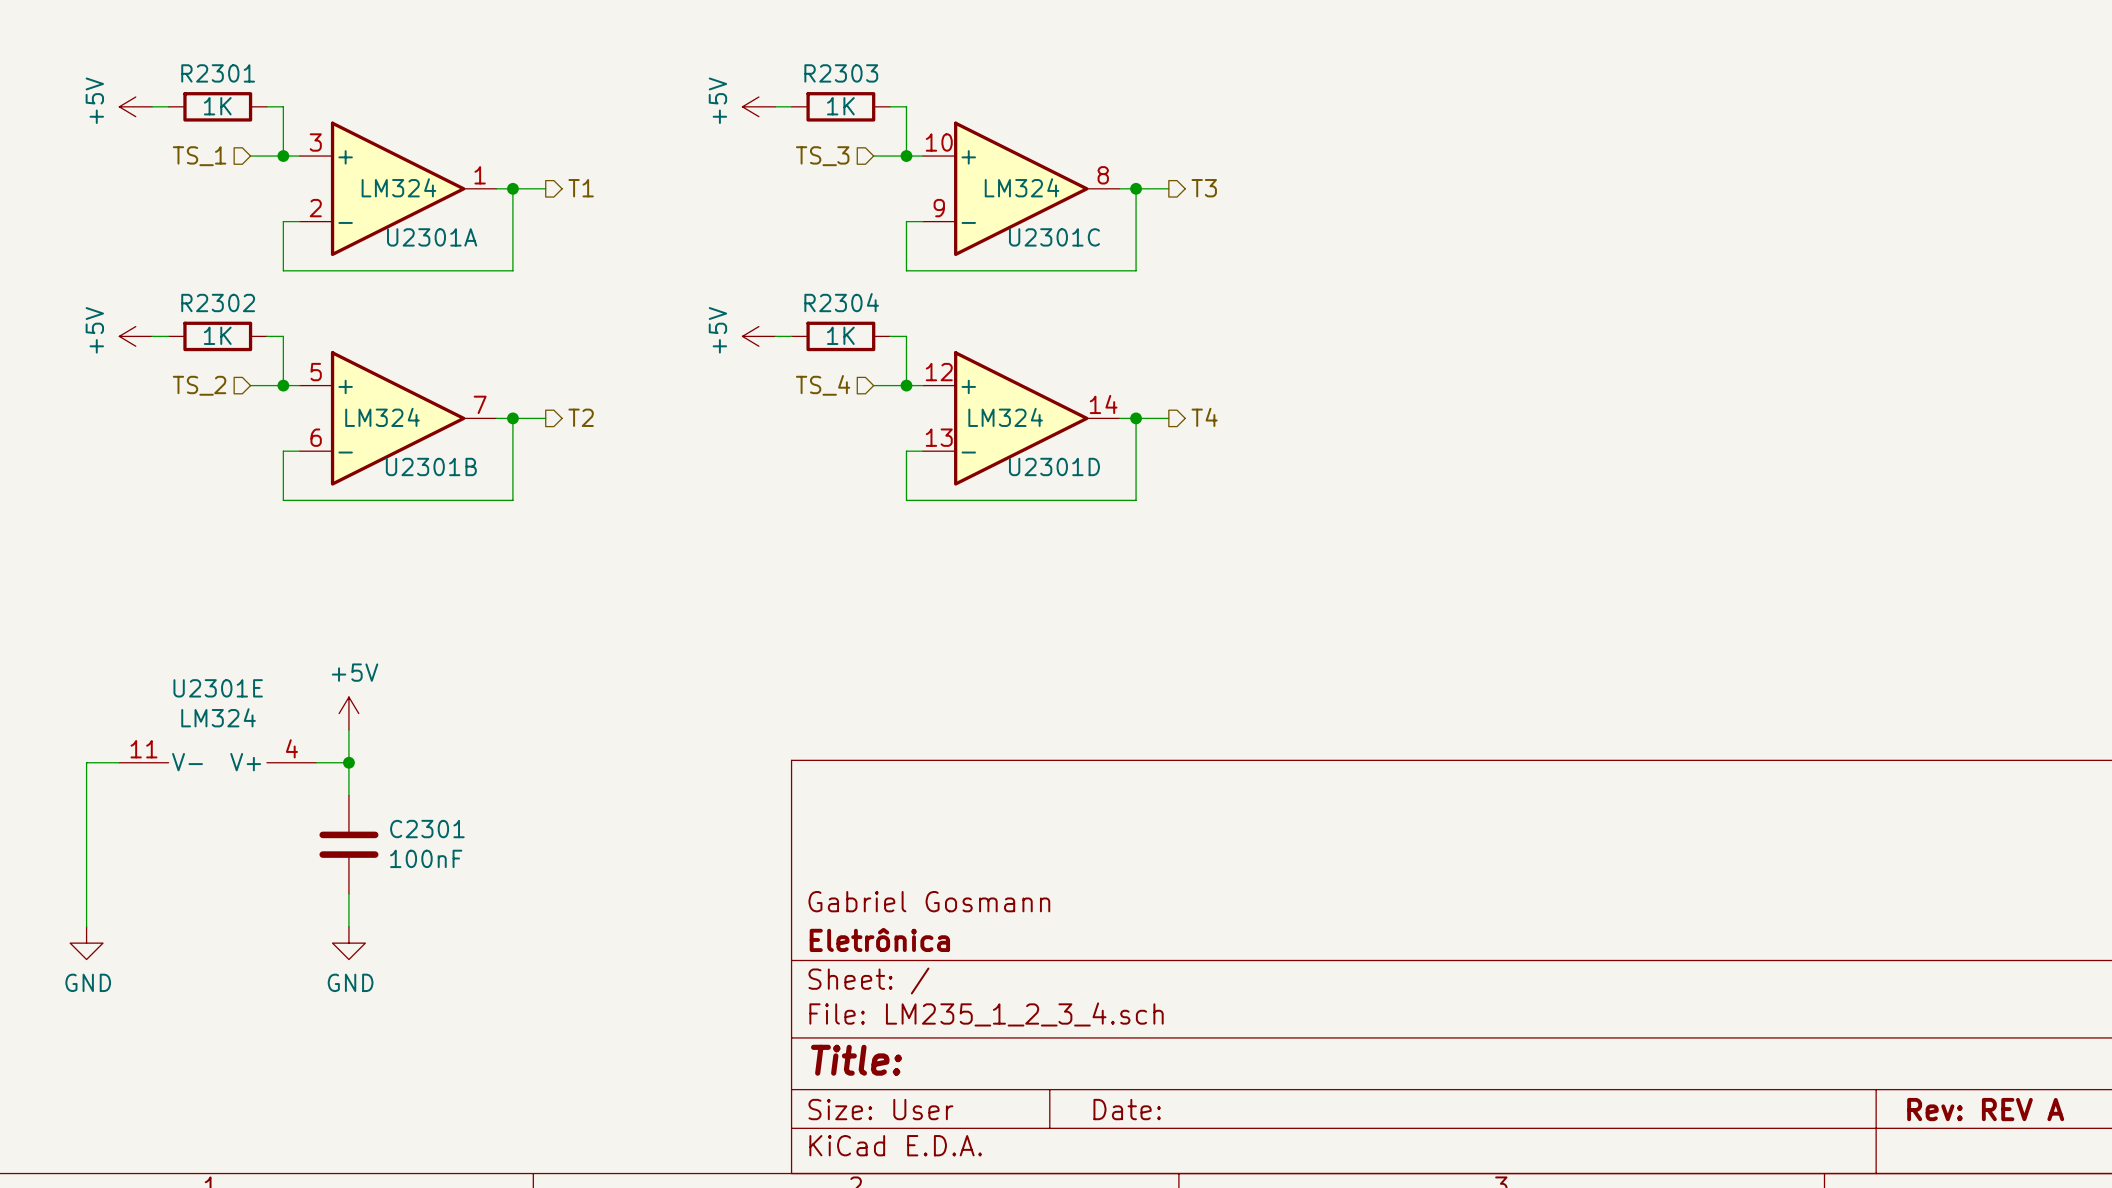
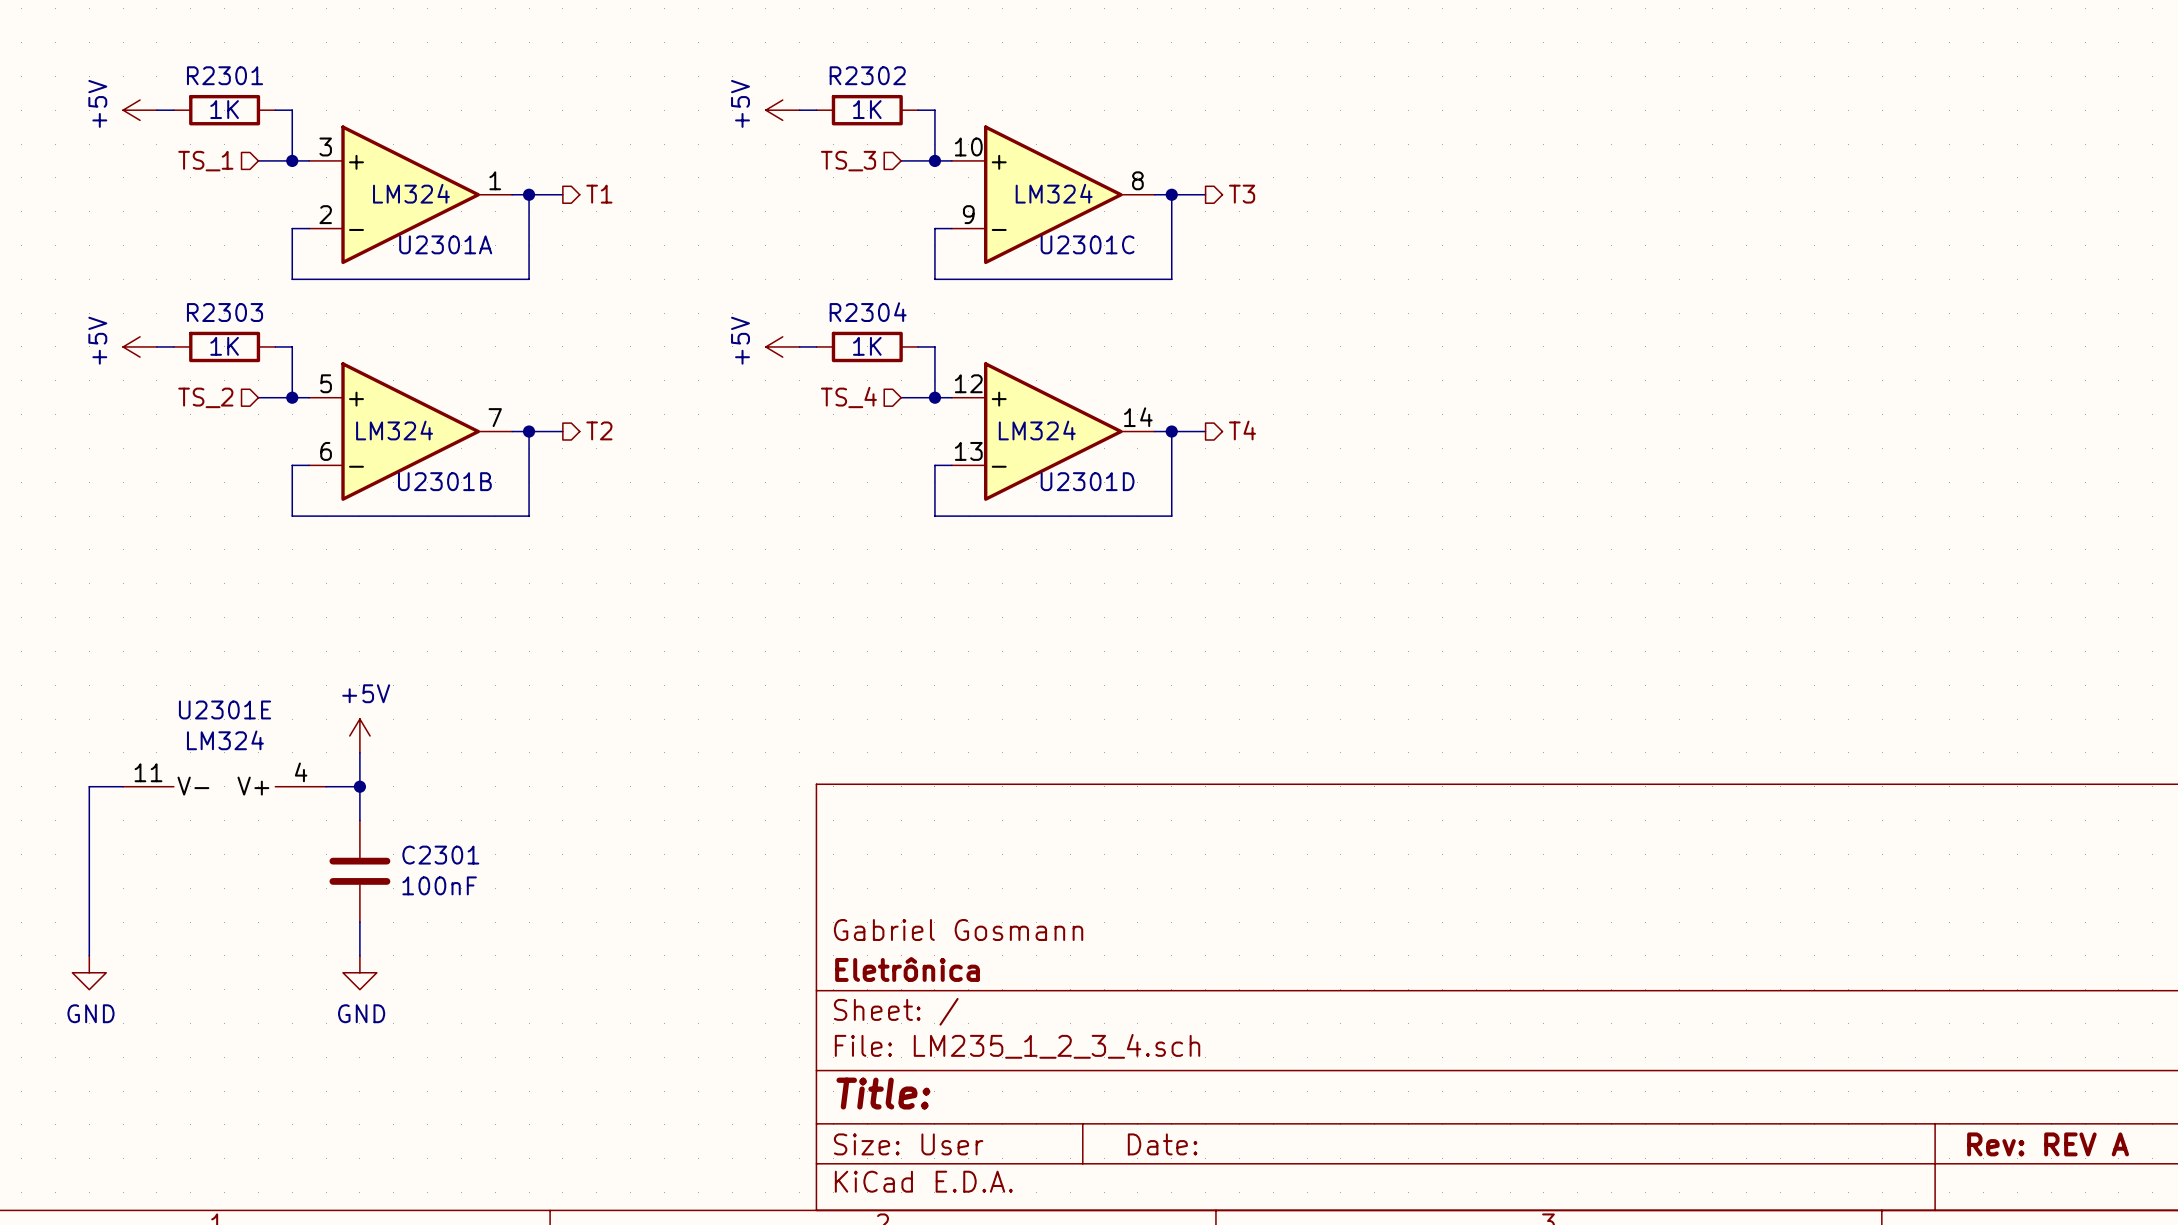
R2303 name: R2303 (841, 73) -> R2302 (867, 75)
R2302 name: R2302 (218, 302) -> R2303 (225, 312)

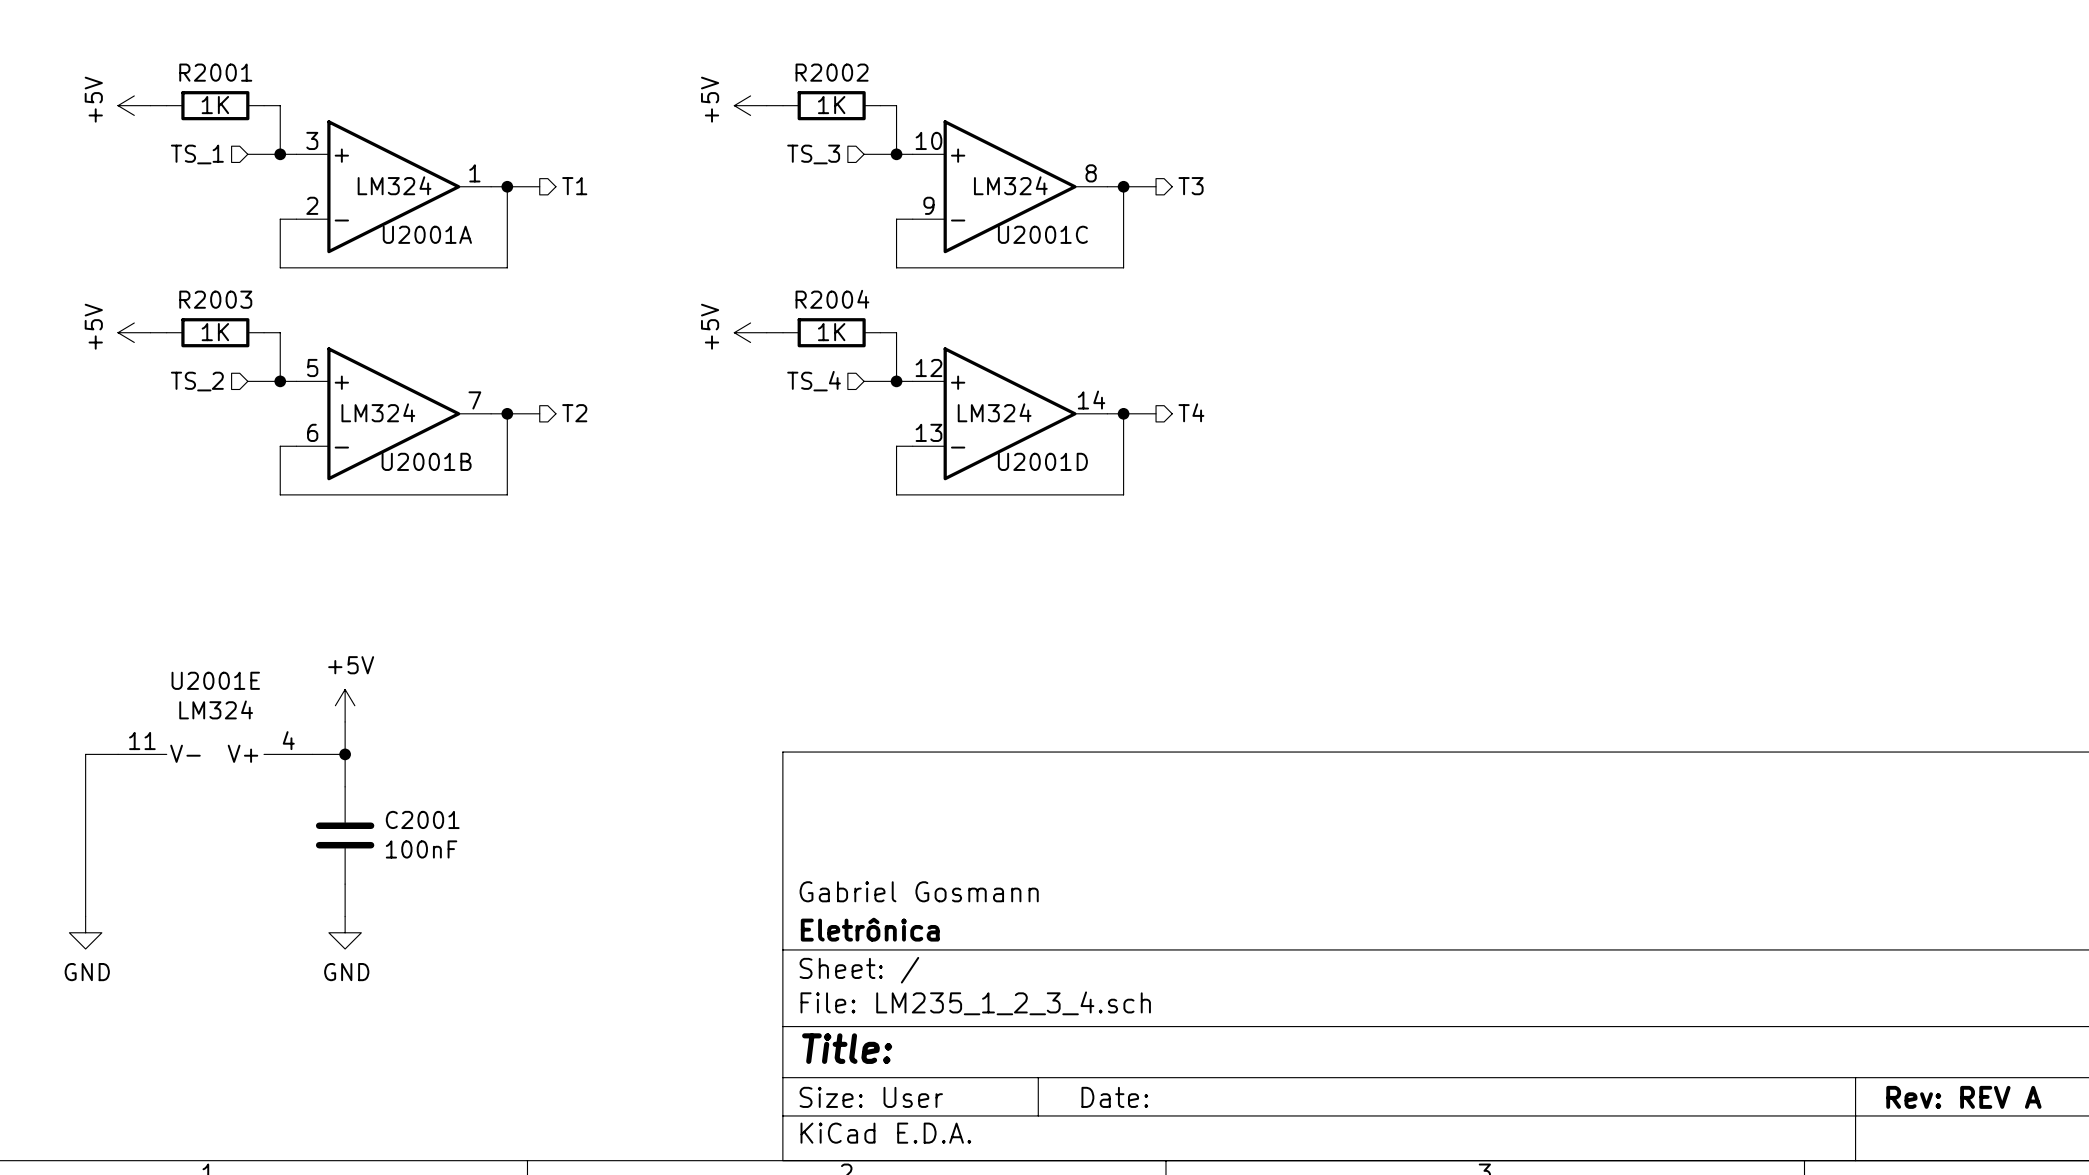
R2301 name: R2301 (225, 75) -> R2001 (215, 72)
R2302 name: R2302 (867, 75) -> R2002 (832, 72)
U2301A name: U2301A (445, 244) -> U2001A (427, 234)
U2301C name: U2301C (1087, 244) -> U2001C (1042, 234)
R2303 name: R2303 (225, 312) -> R2003 (215, 299)
R2304 name: R2304 (868, 312) -> R2004 (832, 299)
U2301B name: U2301B (444, 481) -> U2001B (426, 461)
U2301D name: U2301D (1087, 481) -> U2001D (1042, 461)
U2301E name: U2301E (225, 709) -> U2001E (215, 680)
C2301 name: C2301 (440, 855) -> C2001 (422, 819)

